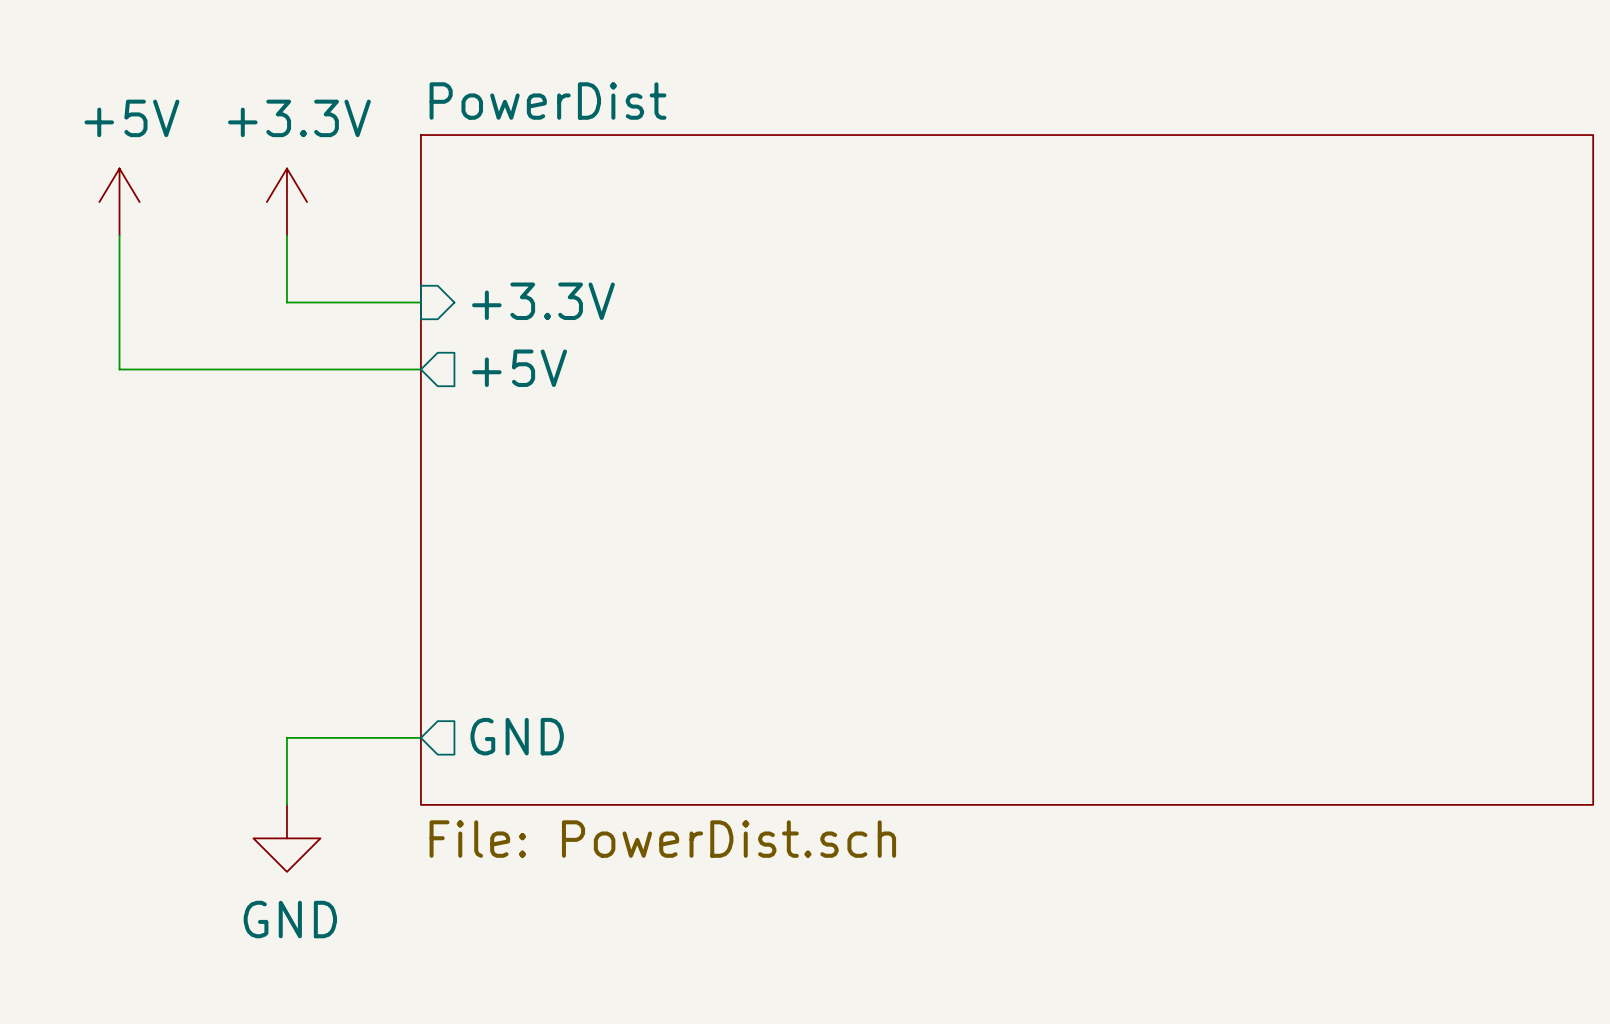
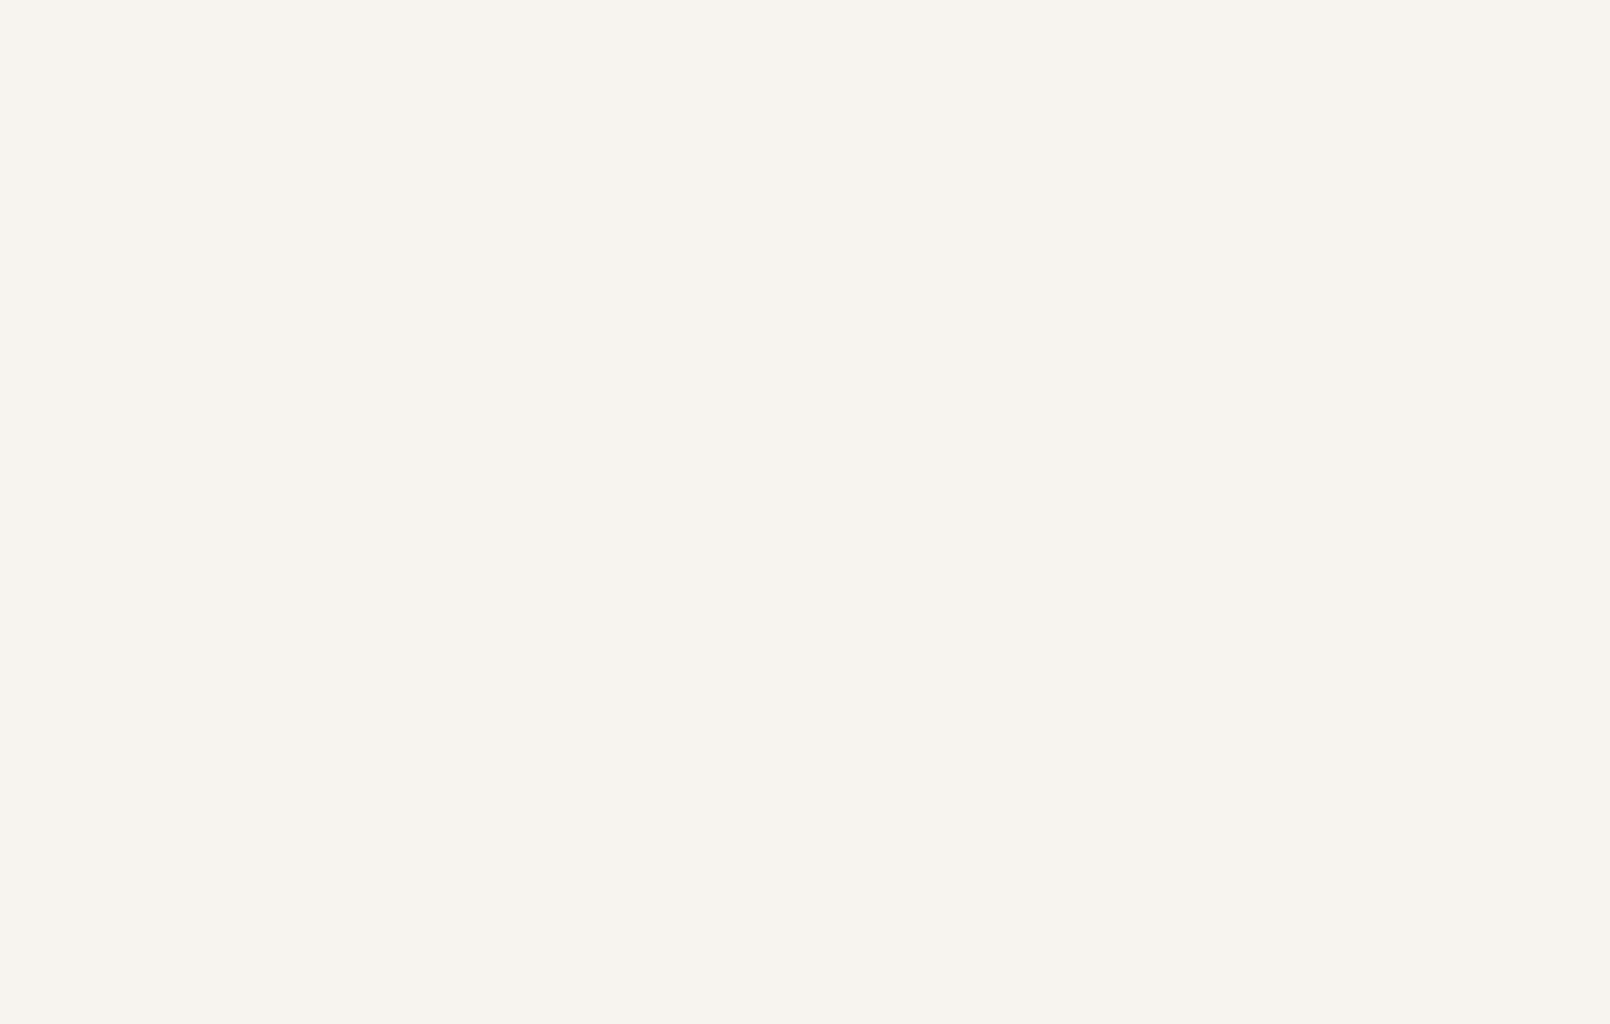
power symbol: +5V (119, 202) -> none
power symbol: +3.3V (286, 202) -> none
wire: (119, 235) (119, 369) (420, 369) -> none
wire: (286, 235) (286, 302) (420, 302) -> none
sheet pin: +3.3V (543, 301) -> none
sheet pin: +5V (519, 368) -> none
sheet PowerDist: File: PowerDist.sch (1007, 469) -> none
sheet pin: GND (517, 736) -> none
wire: (420, 737) (286, 737) (286, 804) -> none
power symbol: GND (286, 838) -> none

